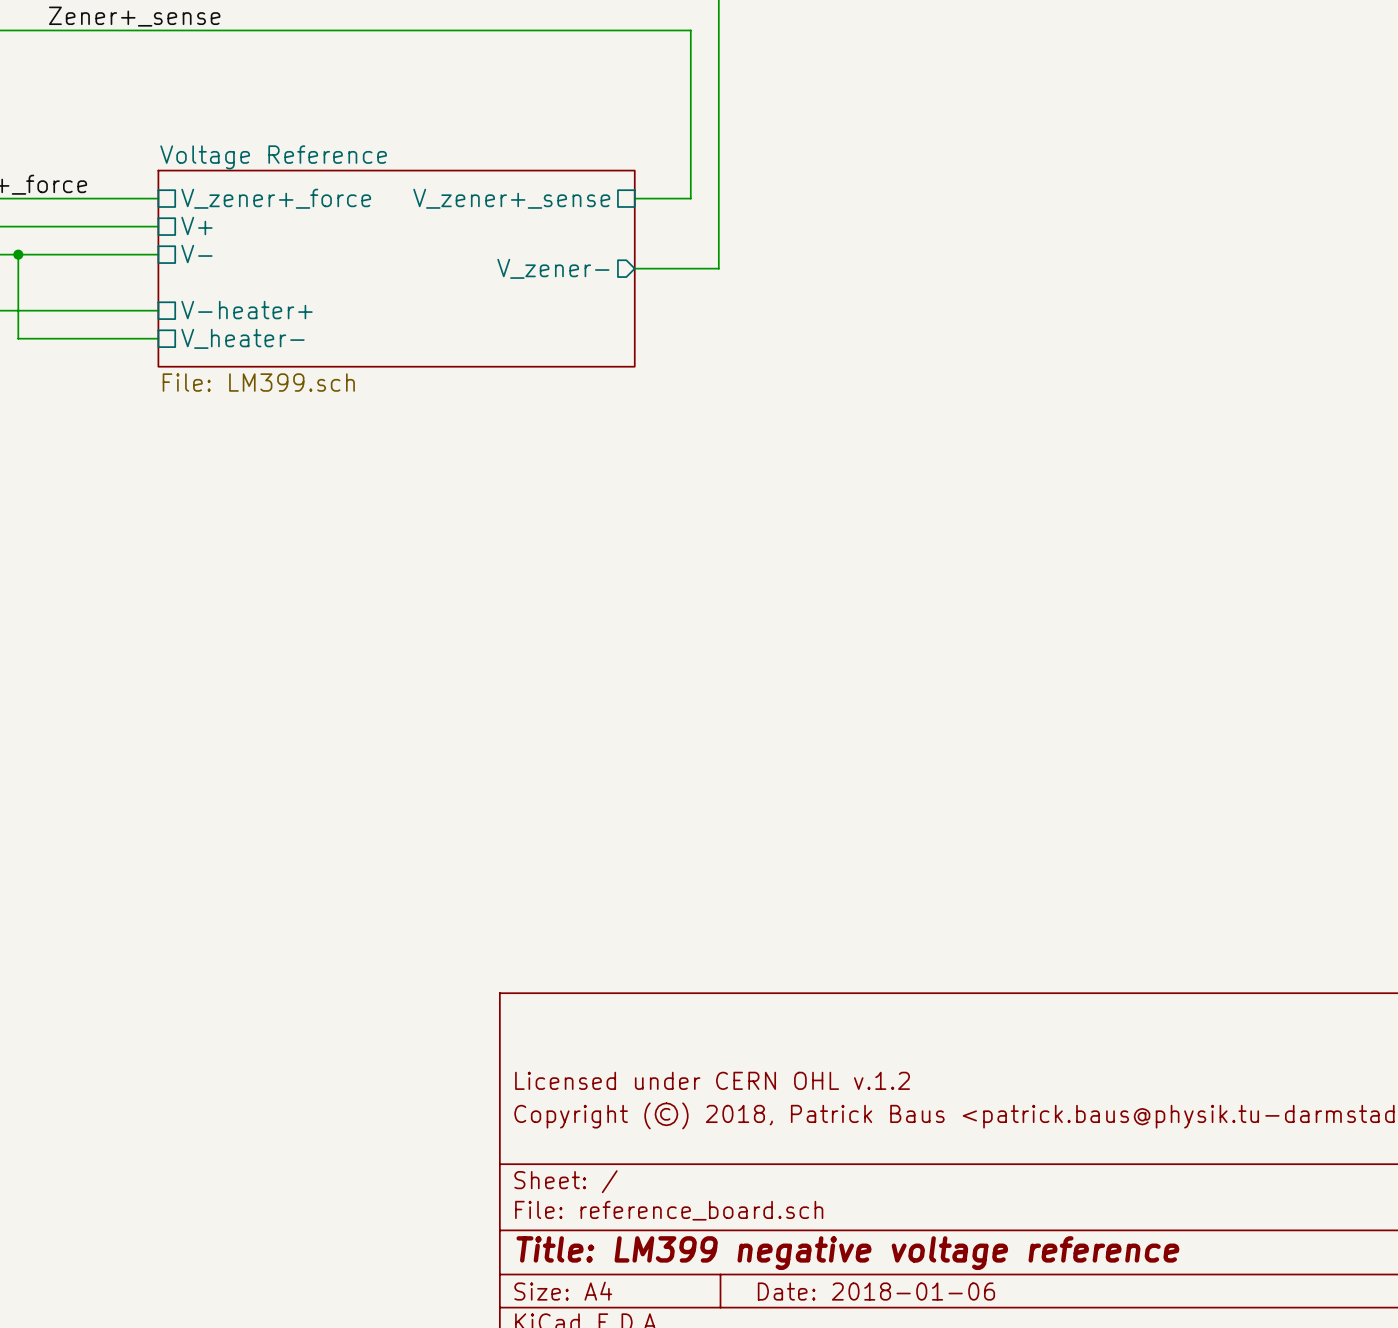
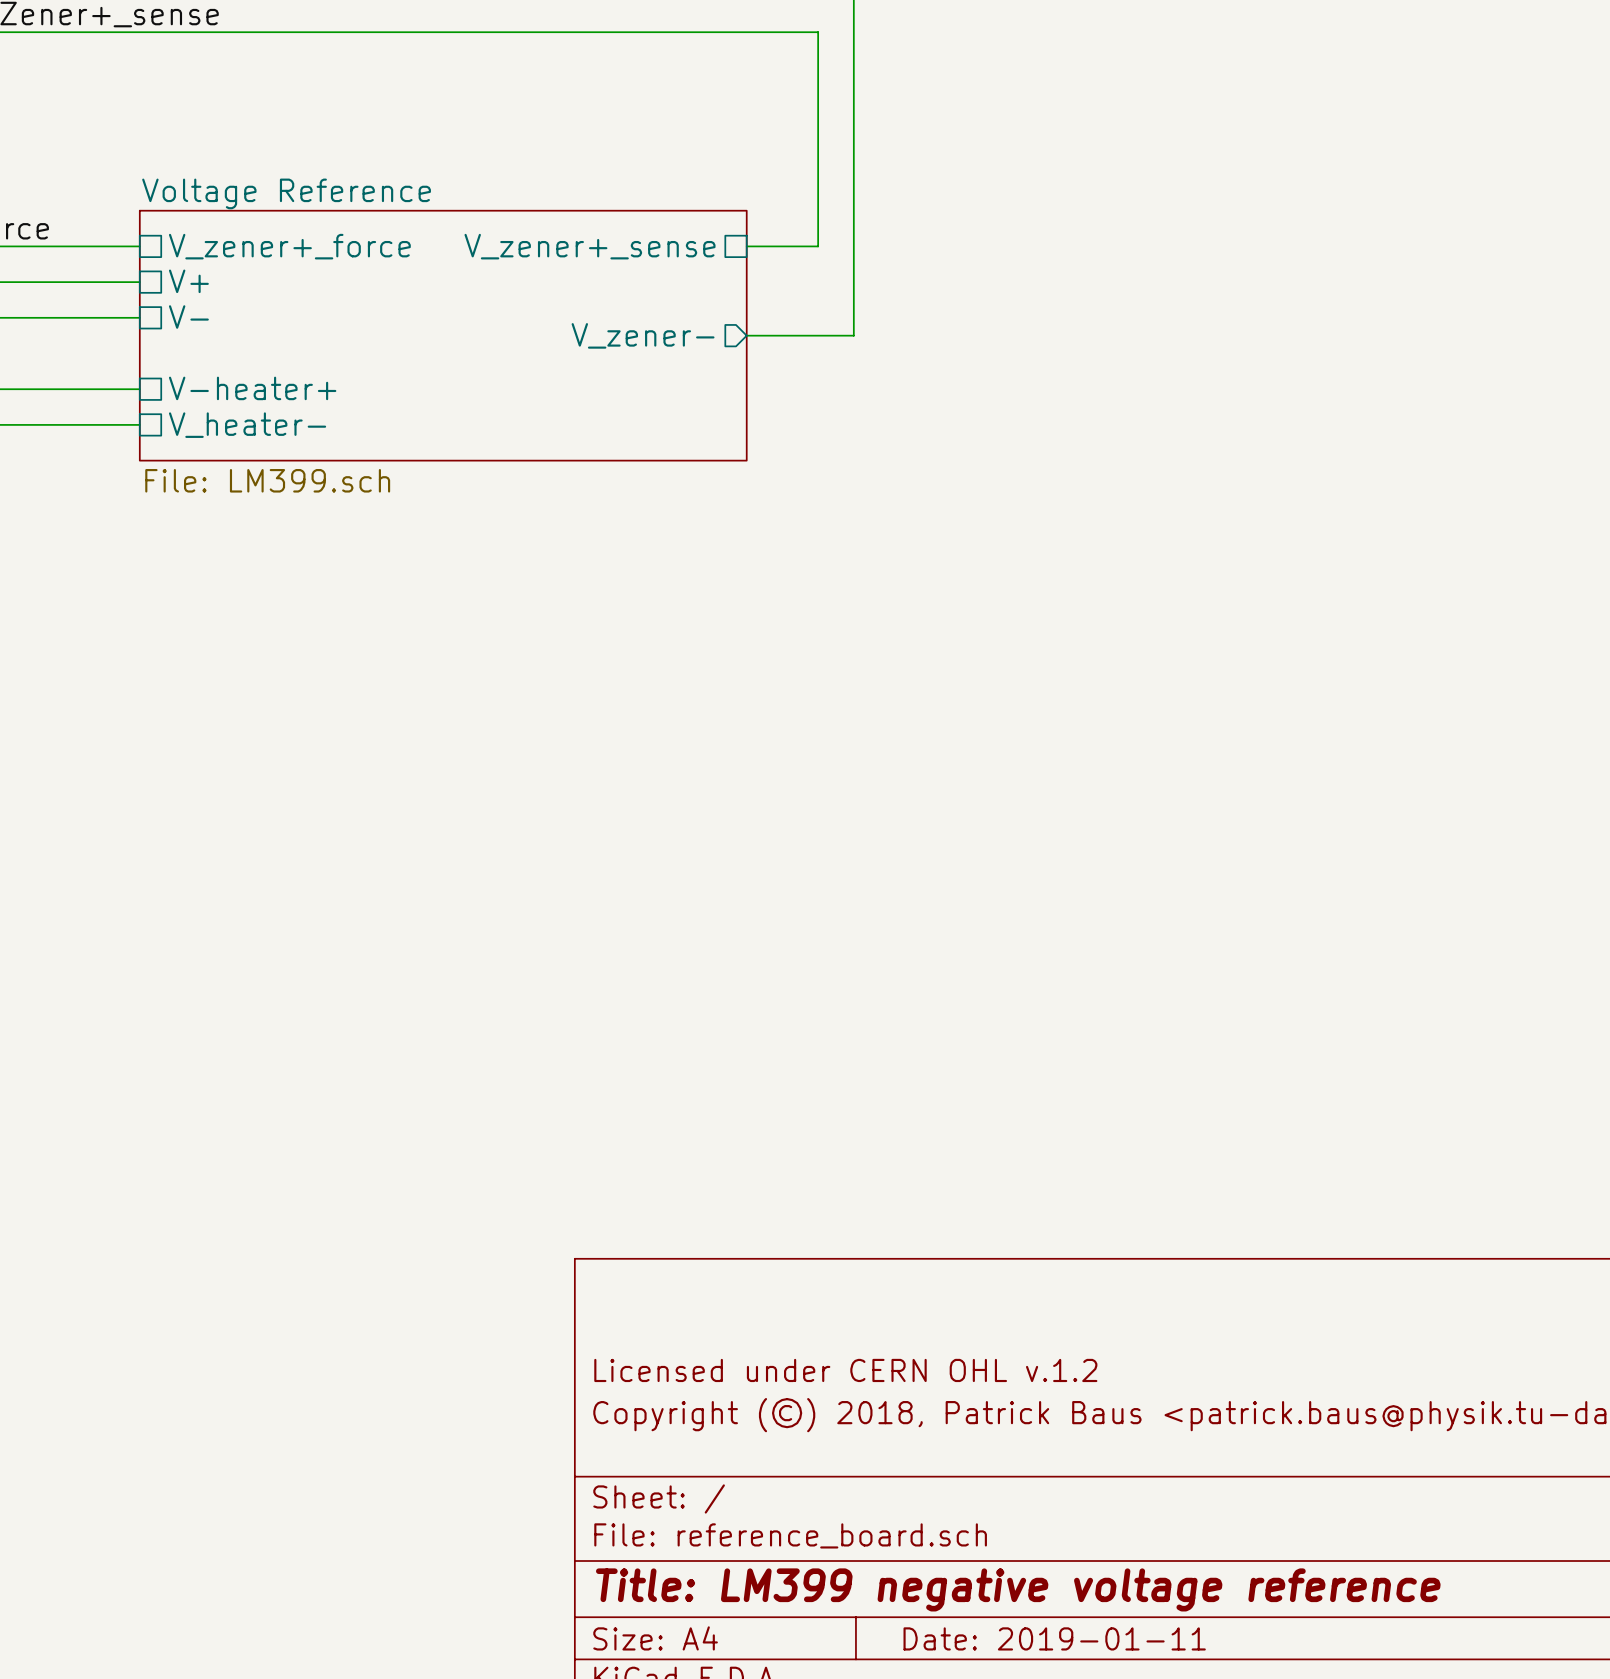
title block: Date: 2018-01-06 (876, 1291) -> Date: 2019-01-11 (1054, 1638)

